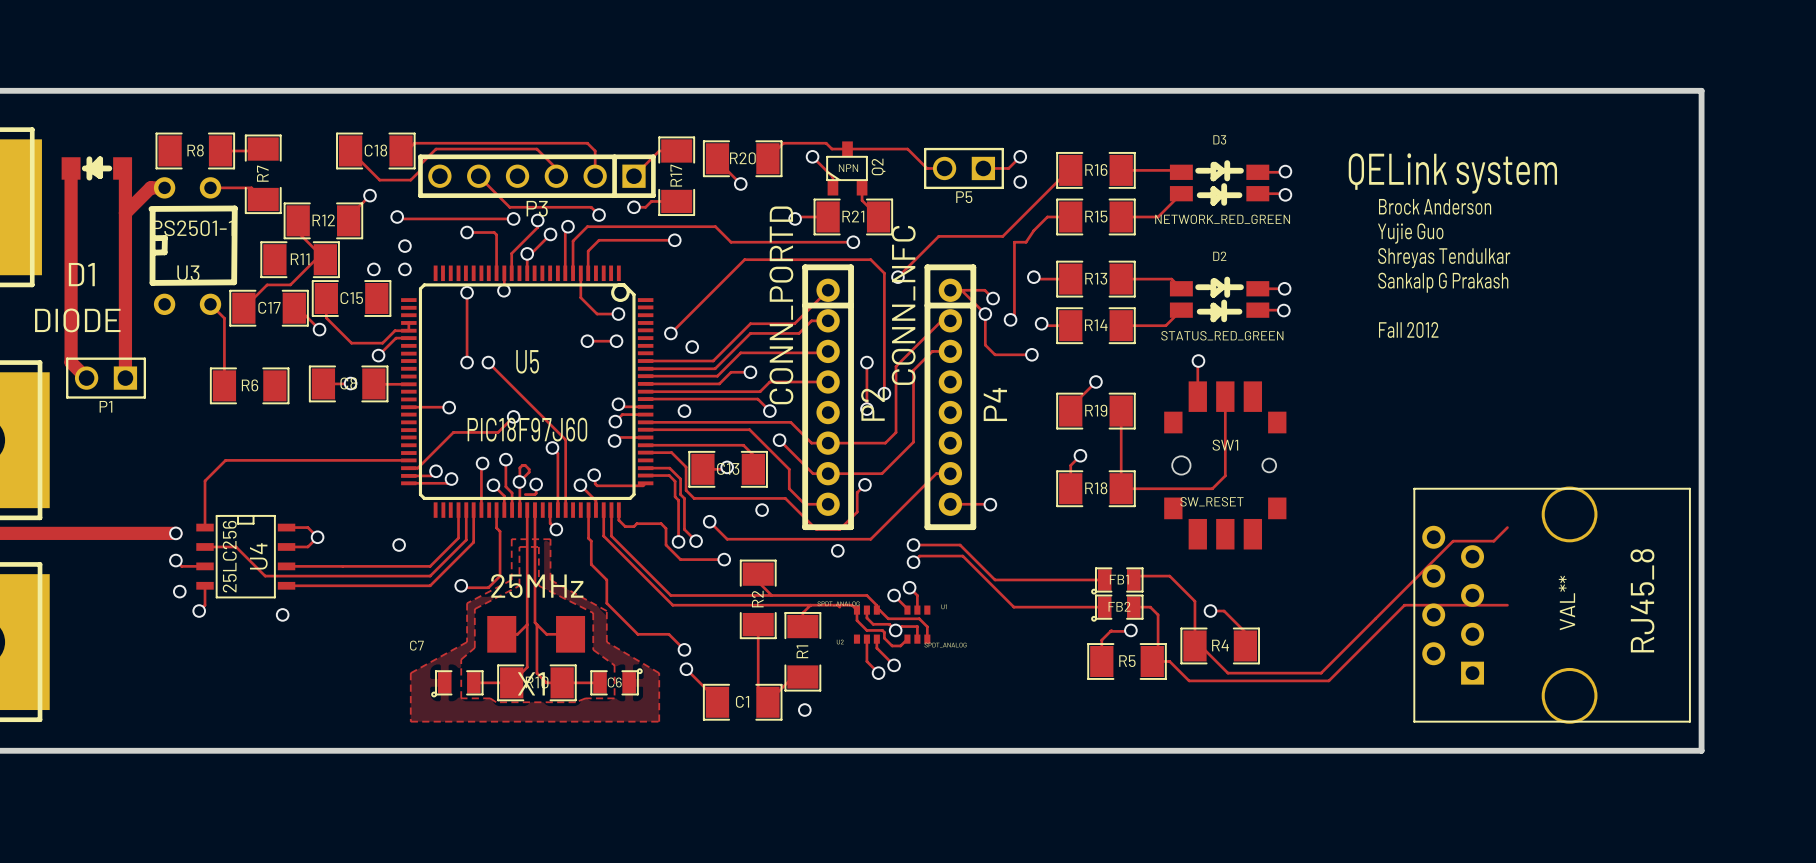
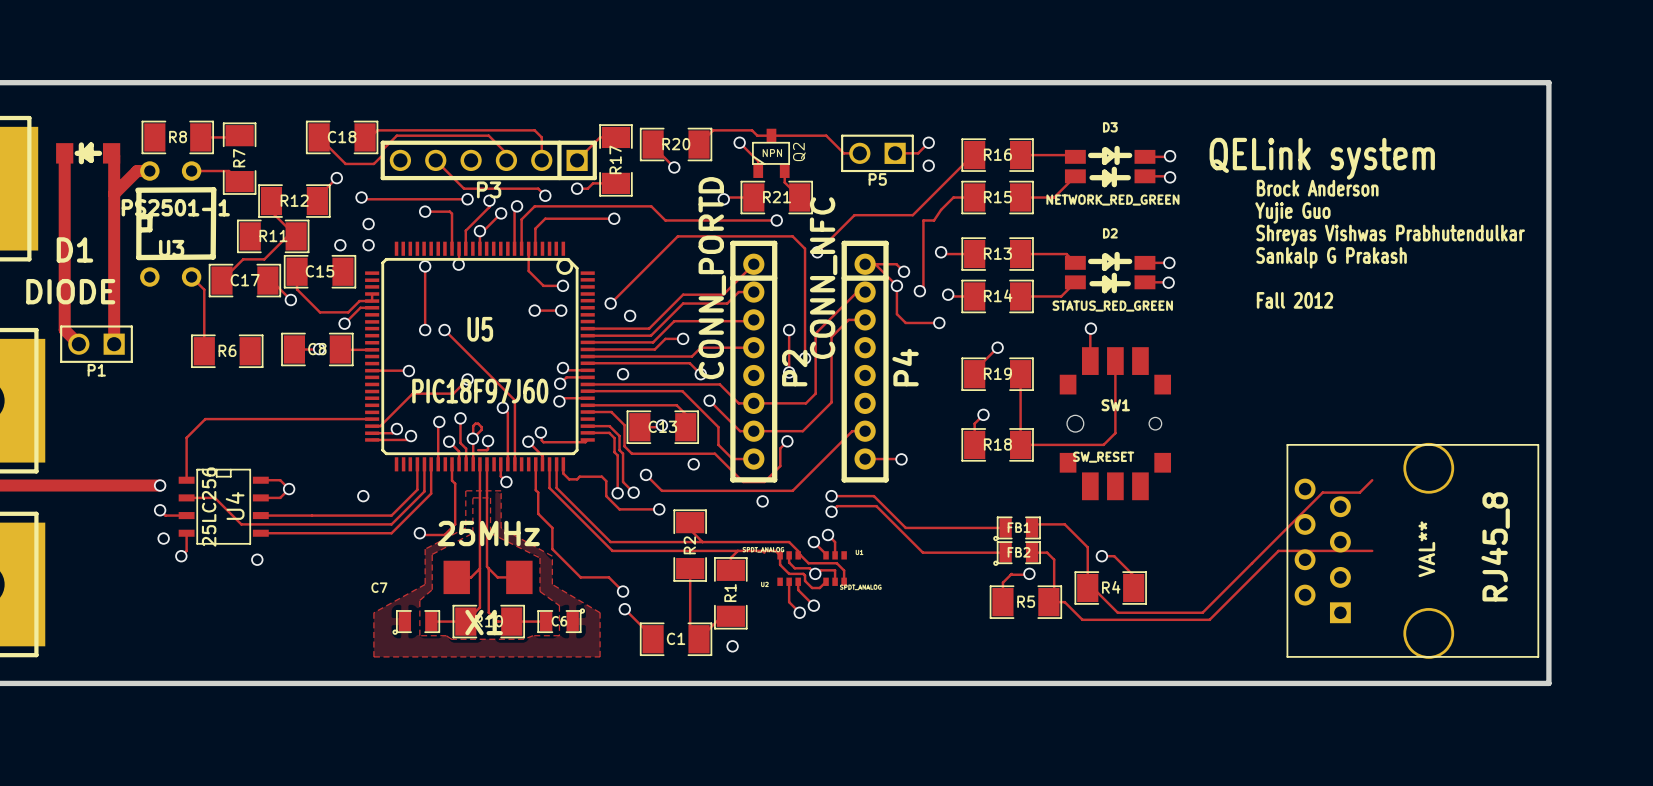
text: Shreyas Tendulkar (1444, 258) -> Shreyas Vishwas Prabhutendulkar (1390, 235)

